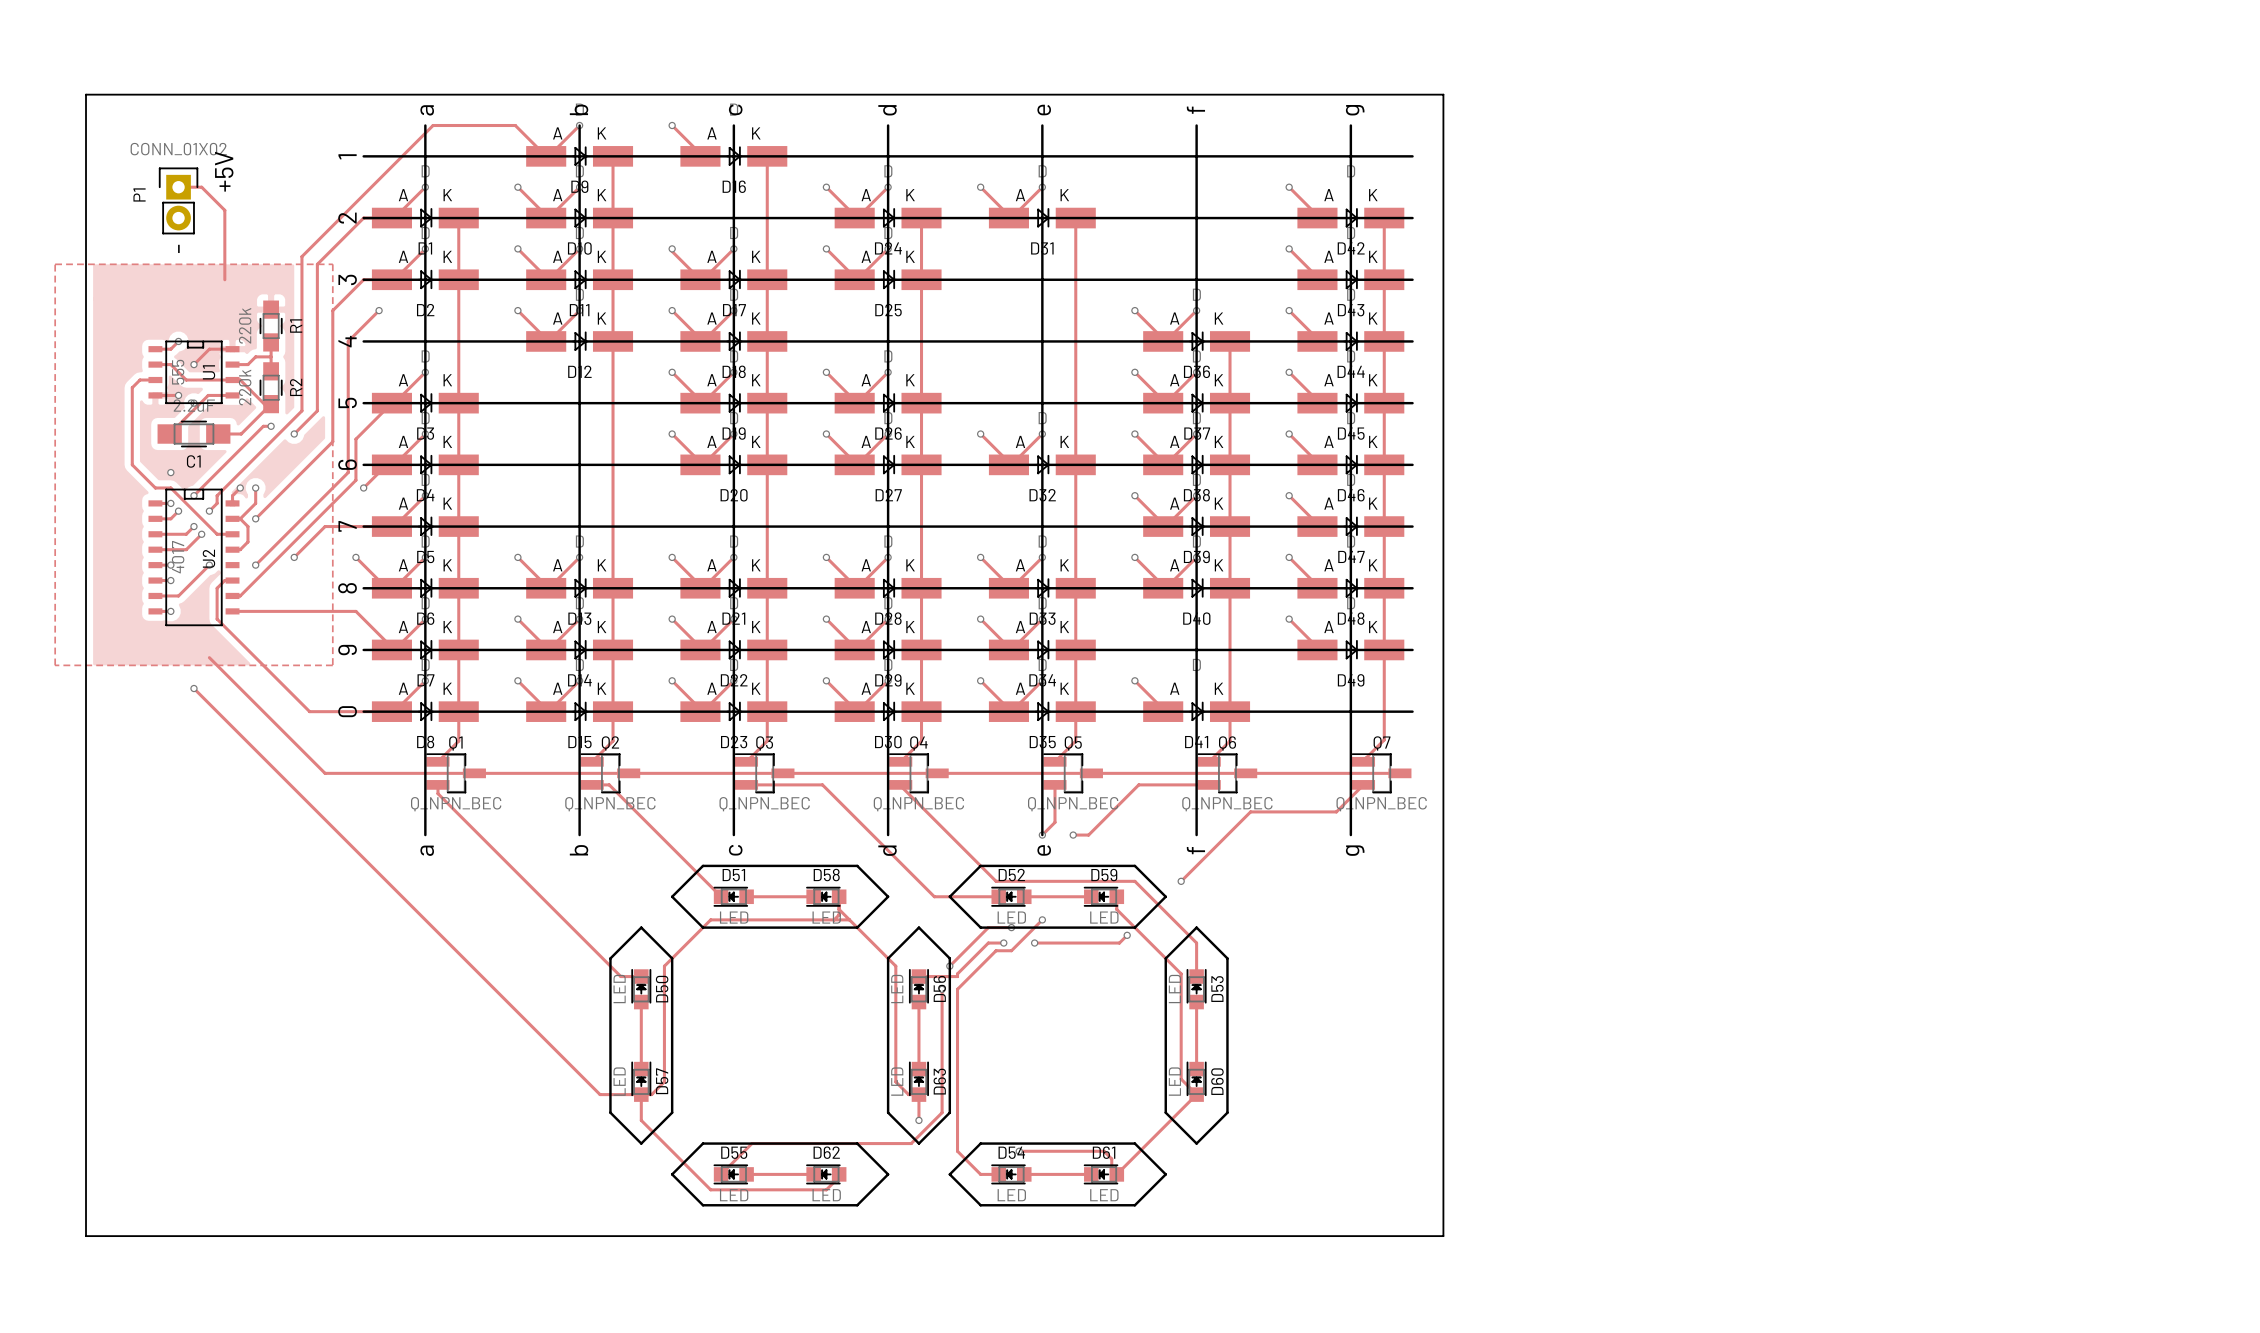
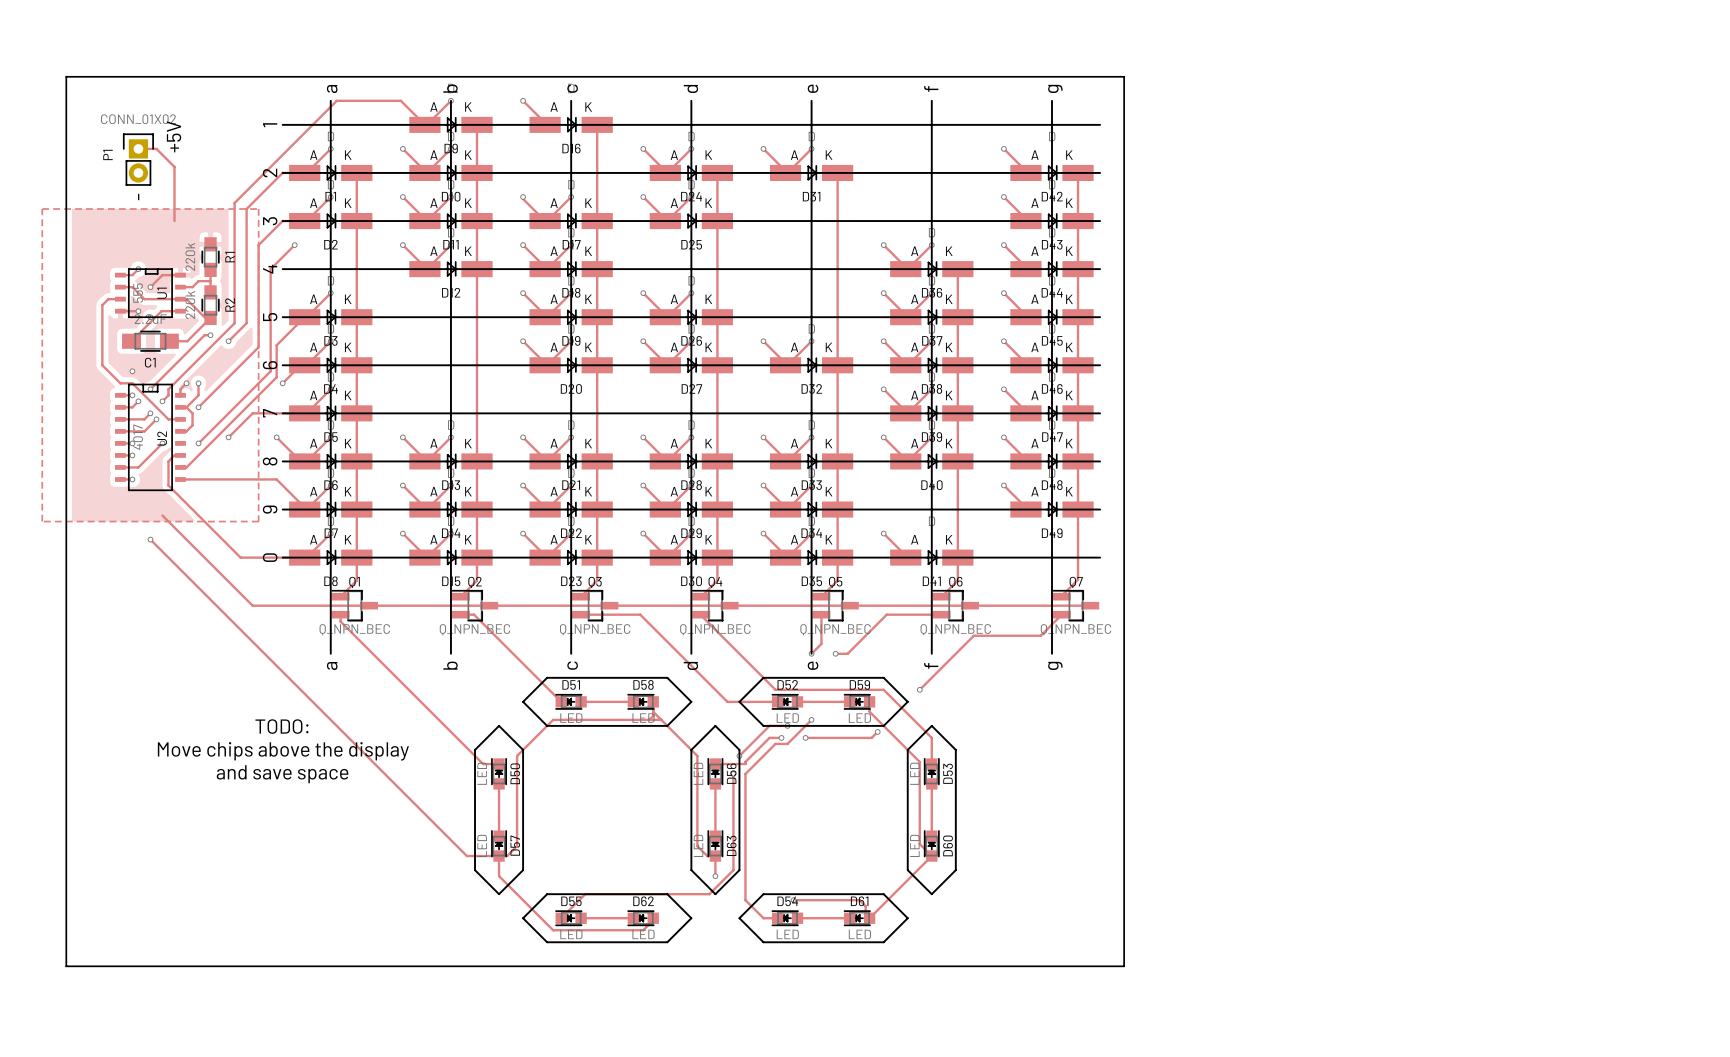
text: none -> TODO: (281, 726)
text: none -> Move chips above the display (283, 751)
text: none -> and save space (282, 774)

